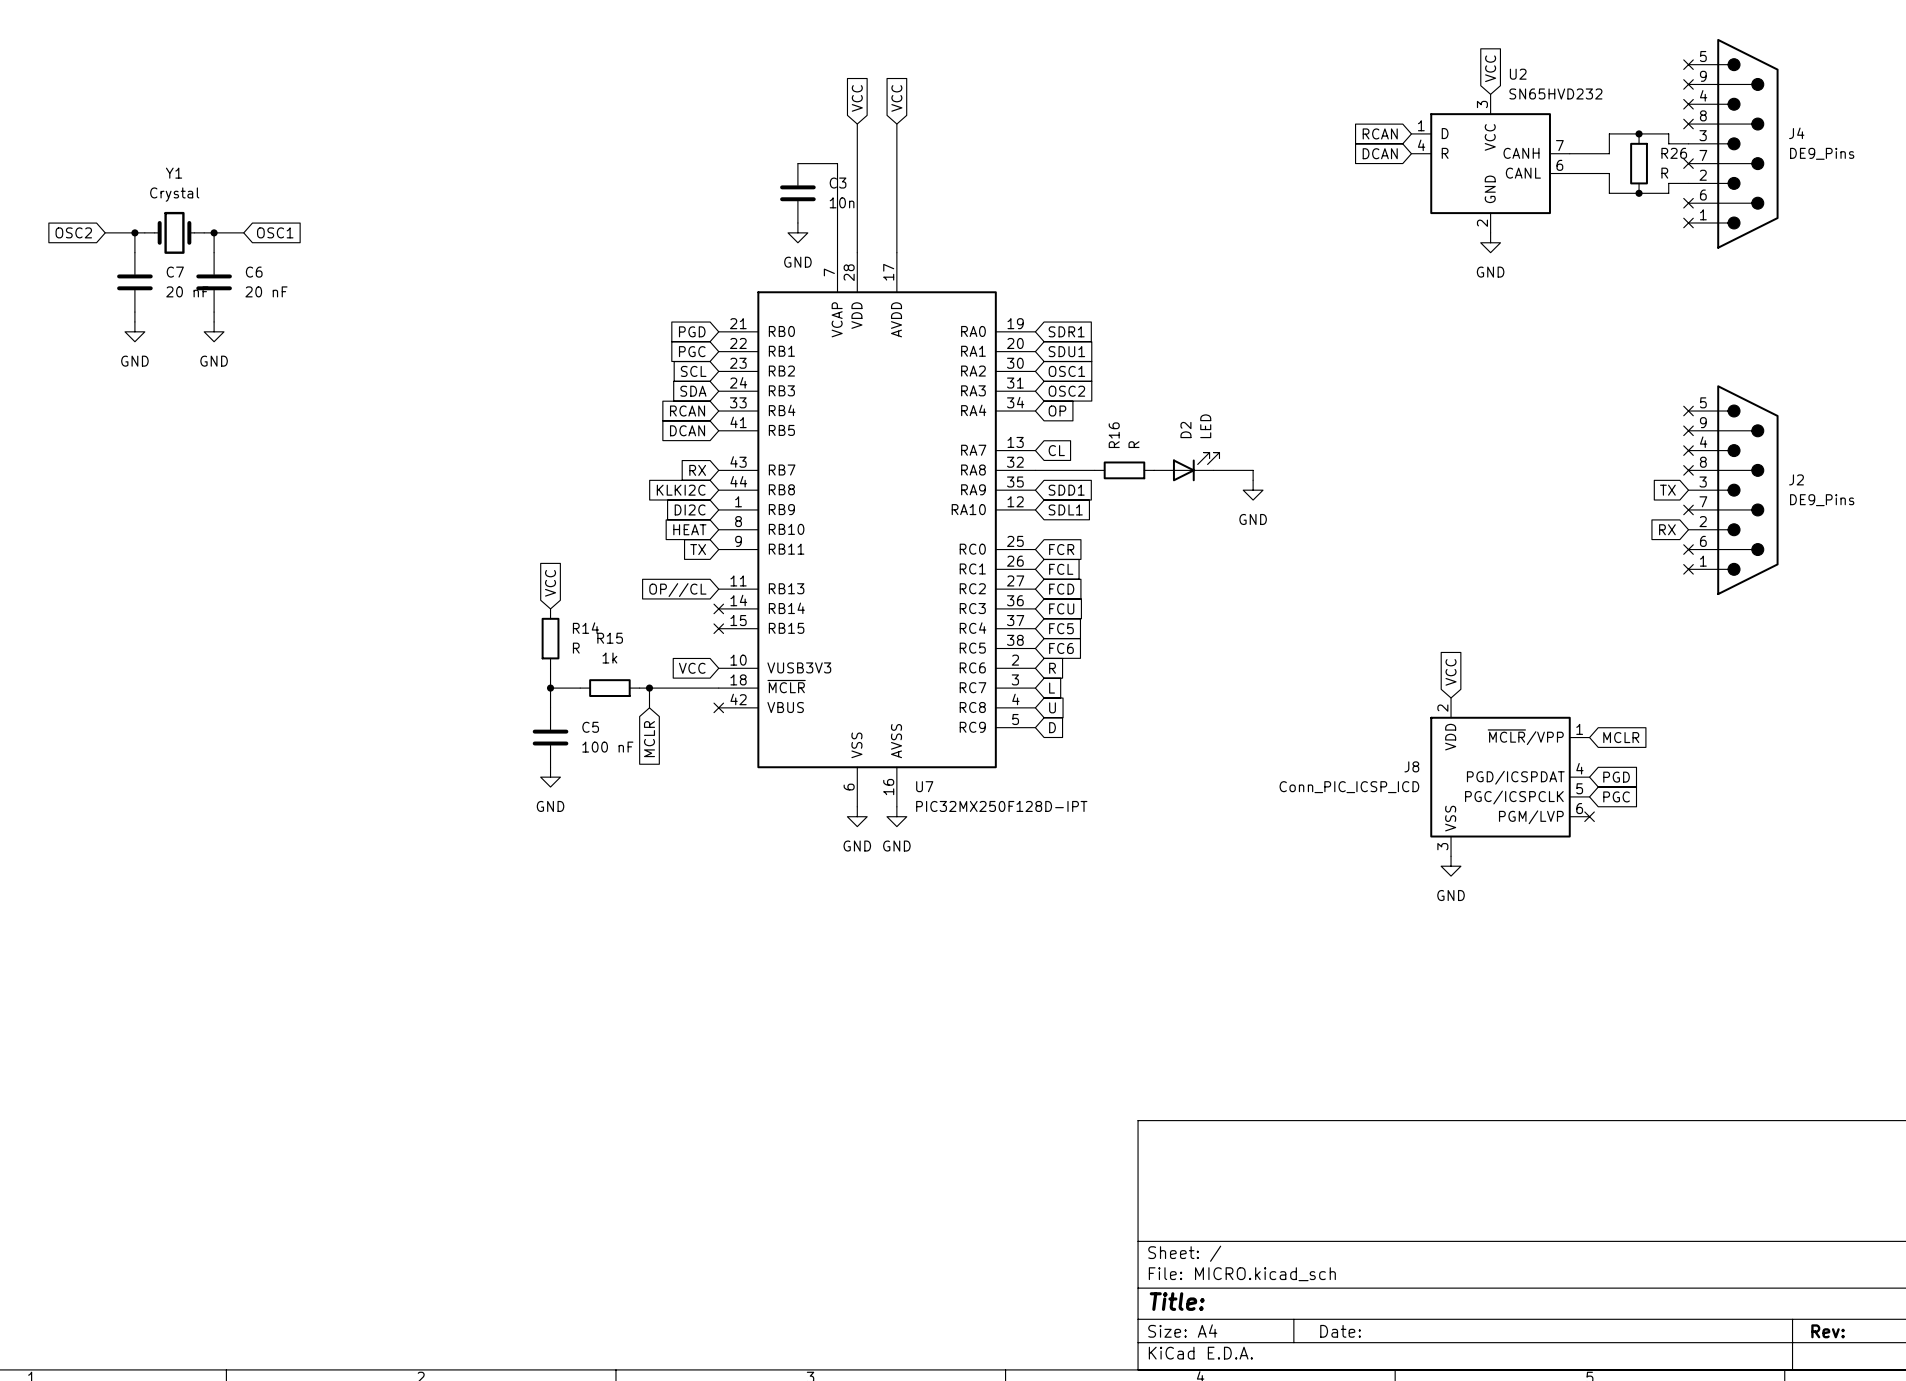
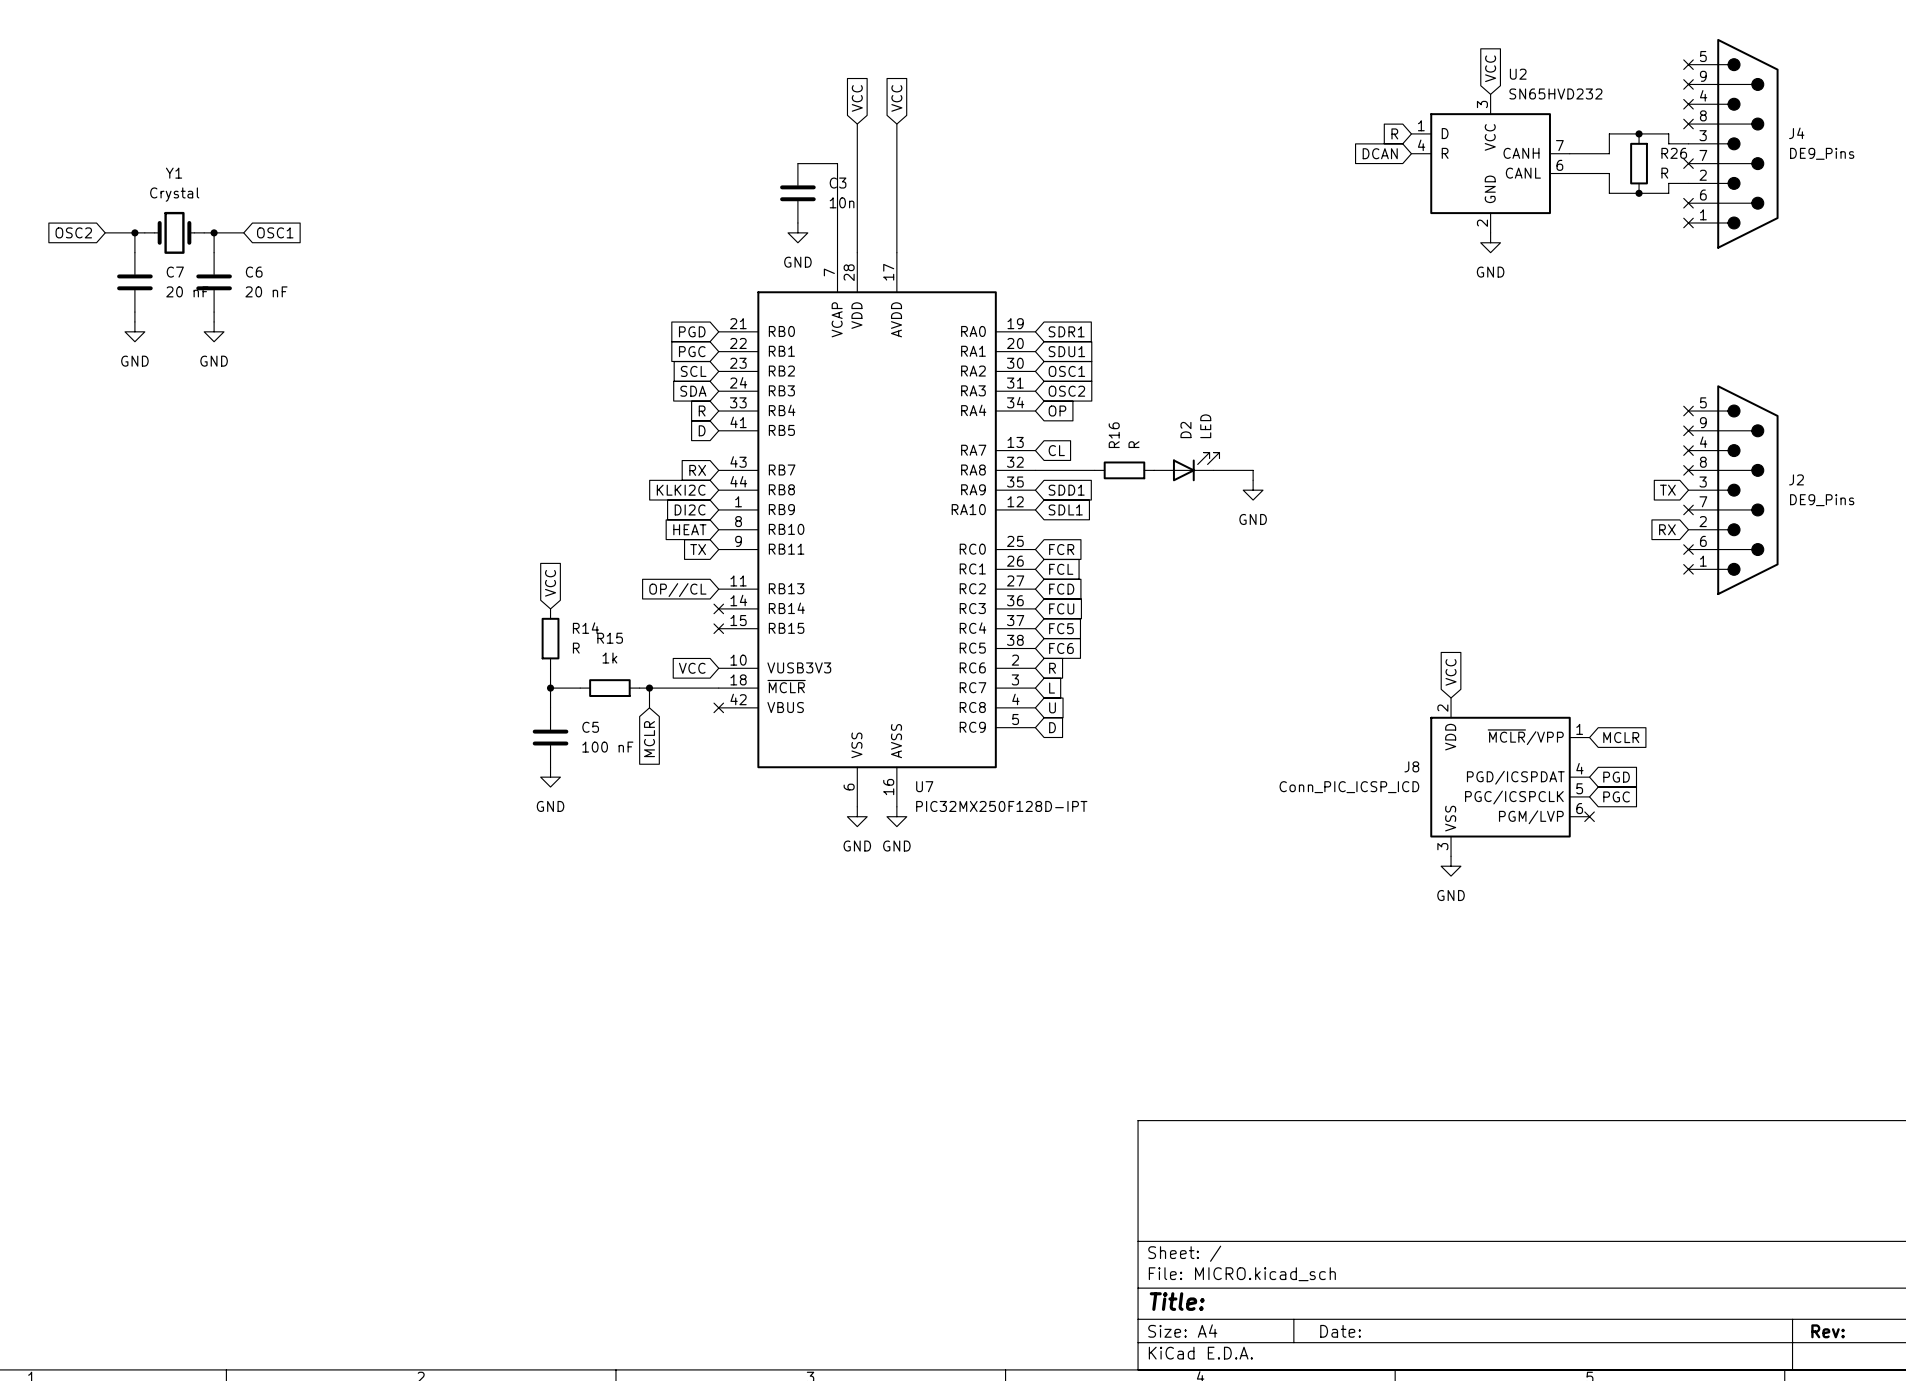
global label: RCAN (1380, 133) -> R (1394, 133)
global label: RCAN (687, 411) -> R (702, 411)
global label: DCAN (687, 430) -> D (702, 430)

